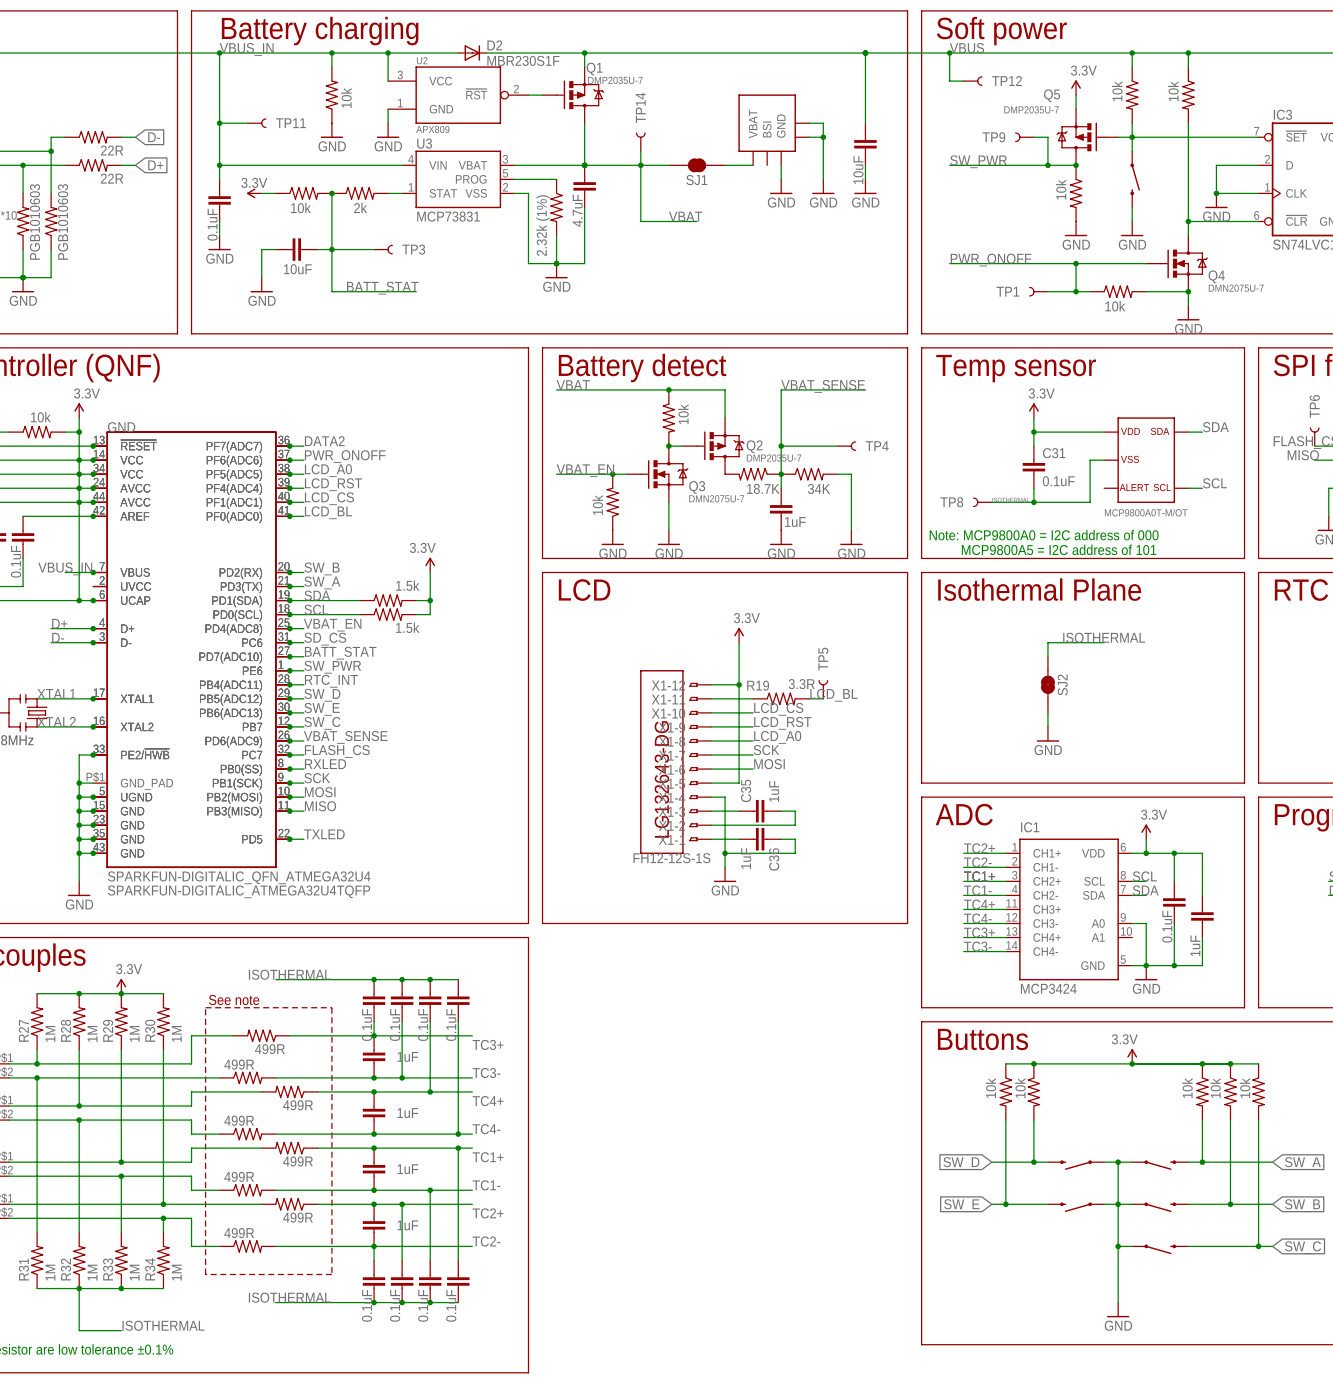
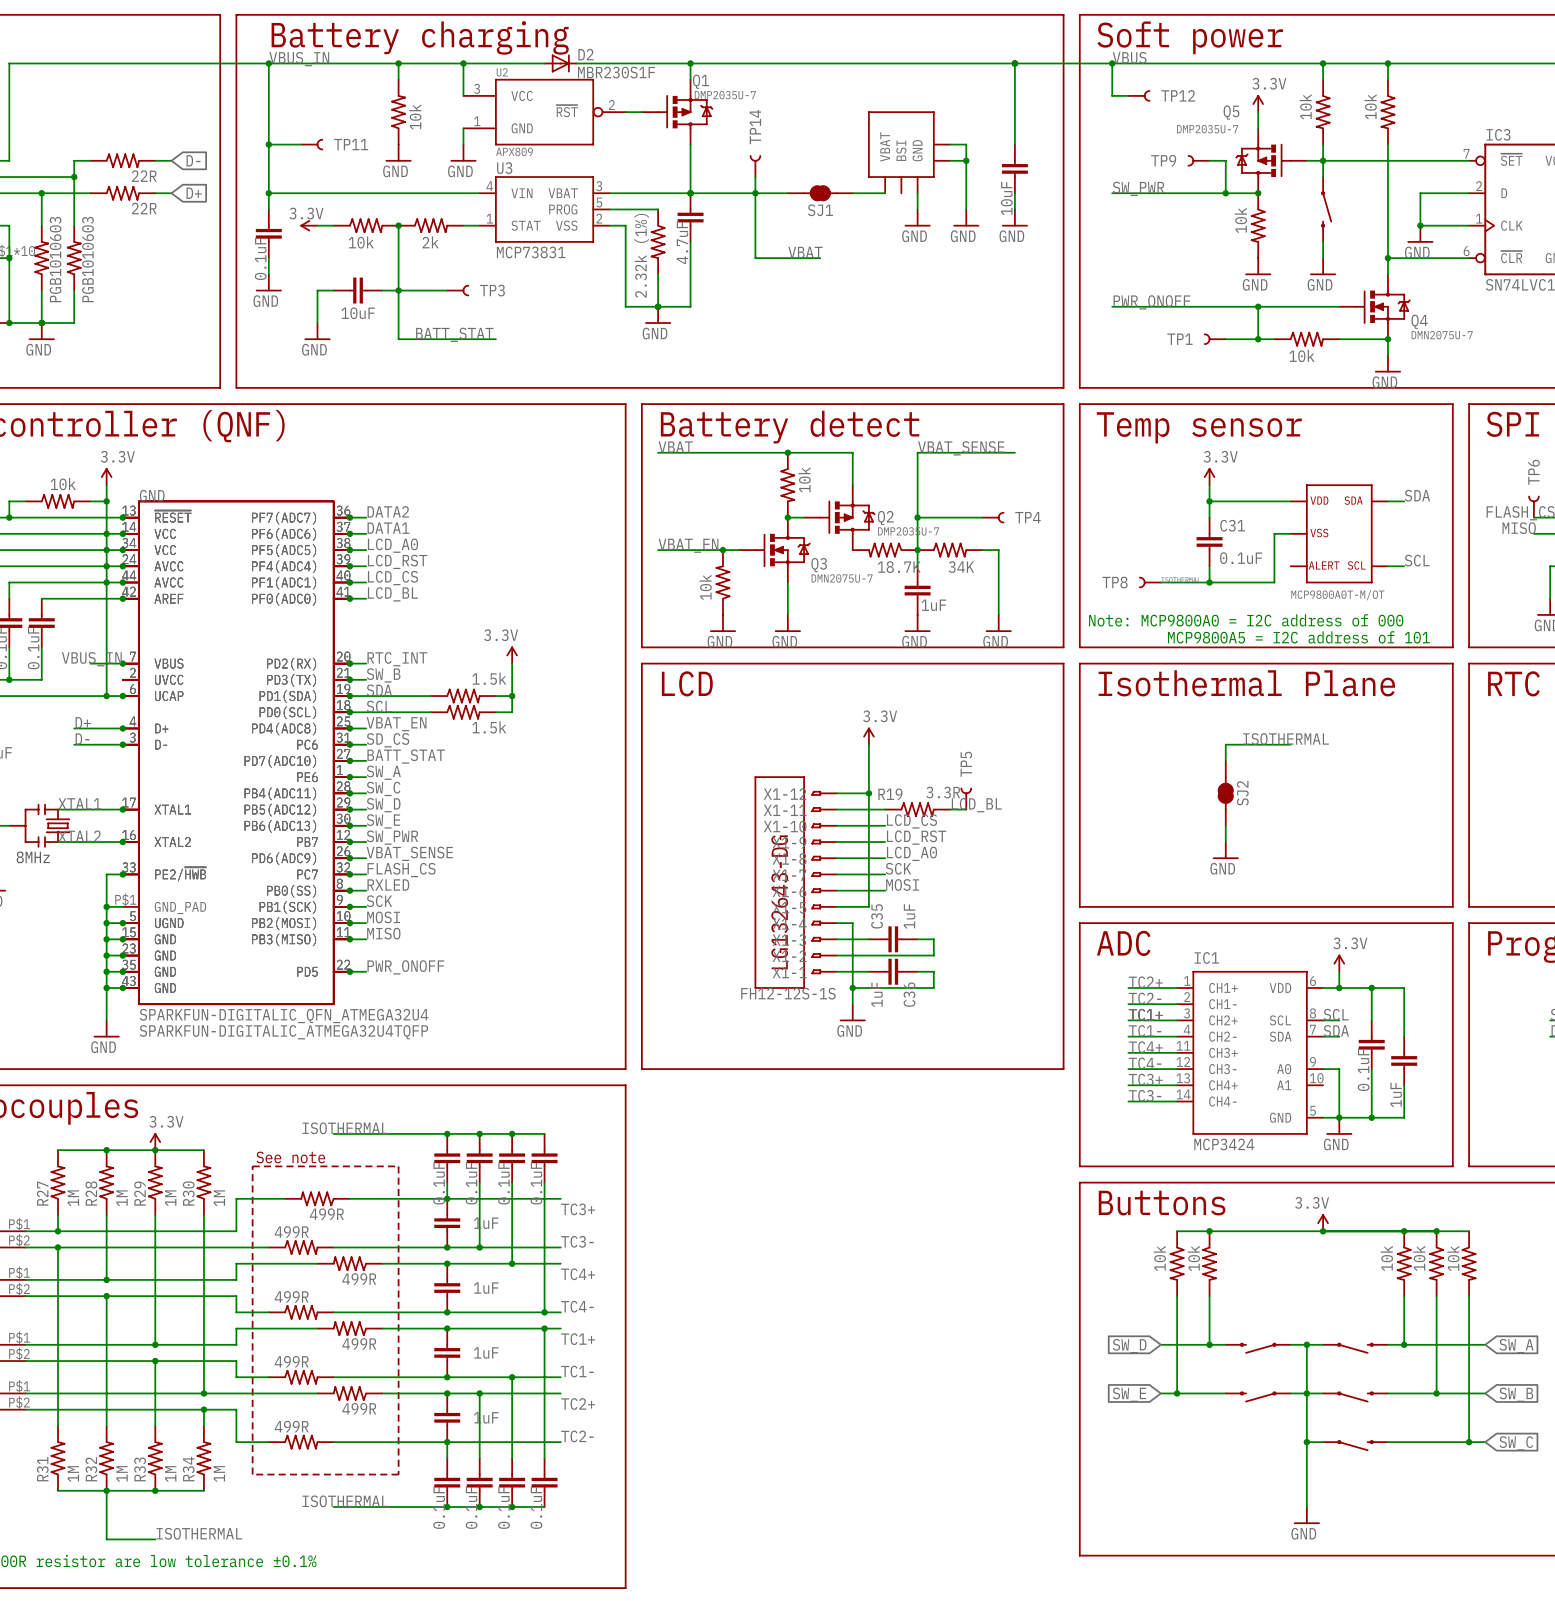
label: PWR_ONOFF (345, 456) -> DATA1 (388, 528)
label: SW_B (322, 568) -> RTC_INT (397, 659)
label: SW_A (322, 582) -> SW_B (383, 675)
label: SW_PWR (332, 667) -> SW_A (383, 772)
label: RTC_INT (331, 681) -> SW_C (383, 788)
label: SW_C (322, 723) -> SW_PWR (392, 837)
label: TXLED (324, 834) -> PWR_ONOFF (405, 967)

